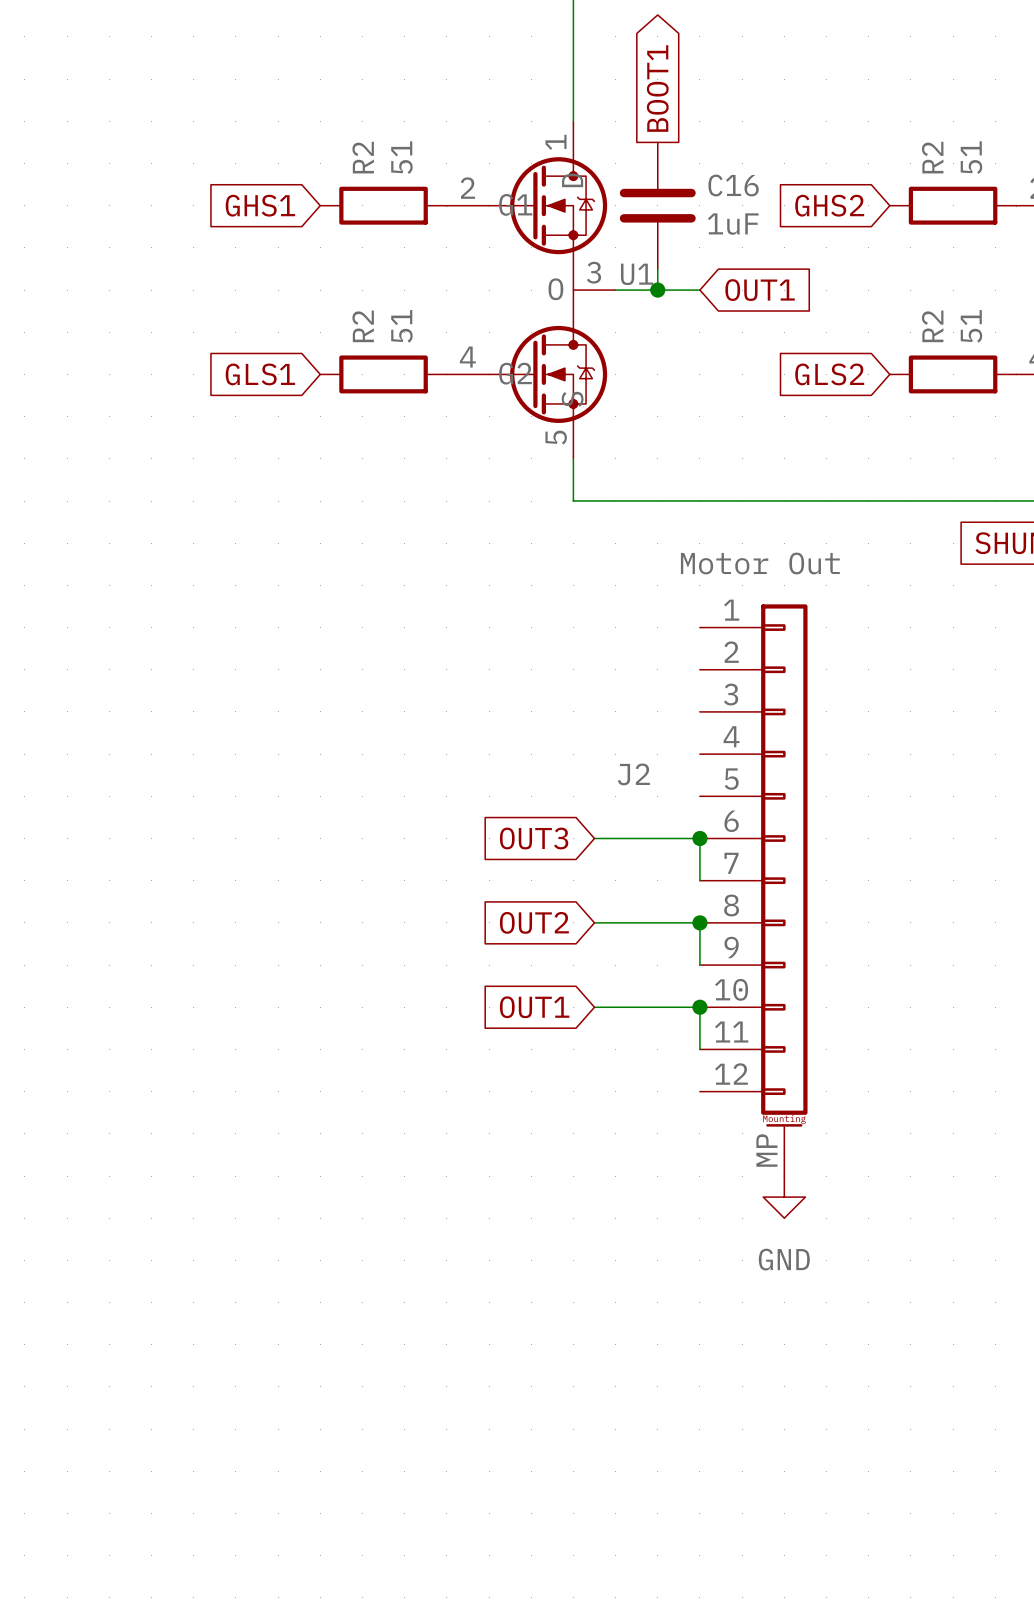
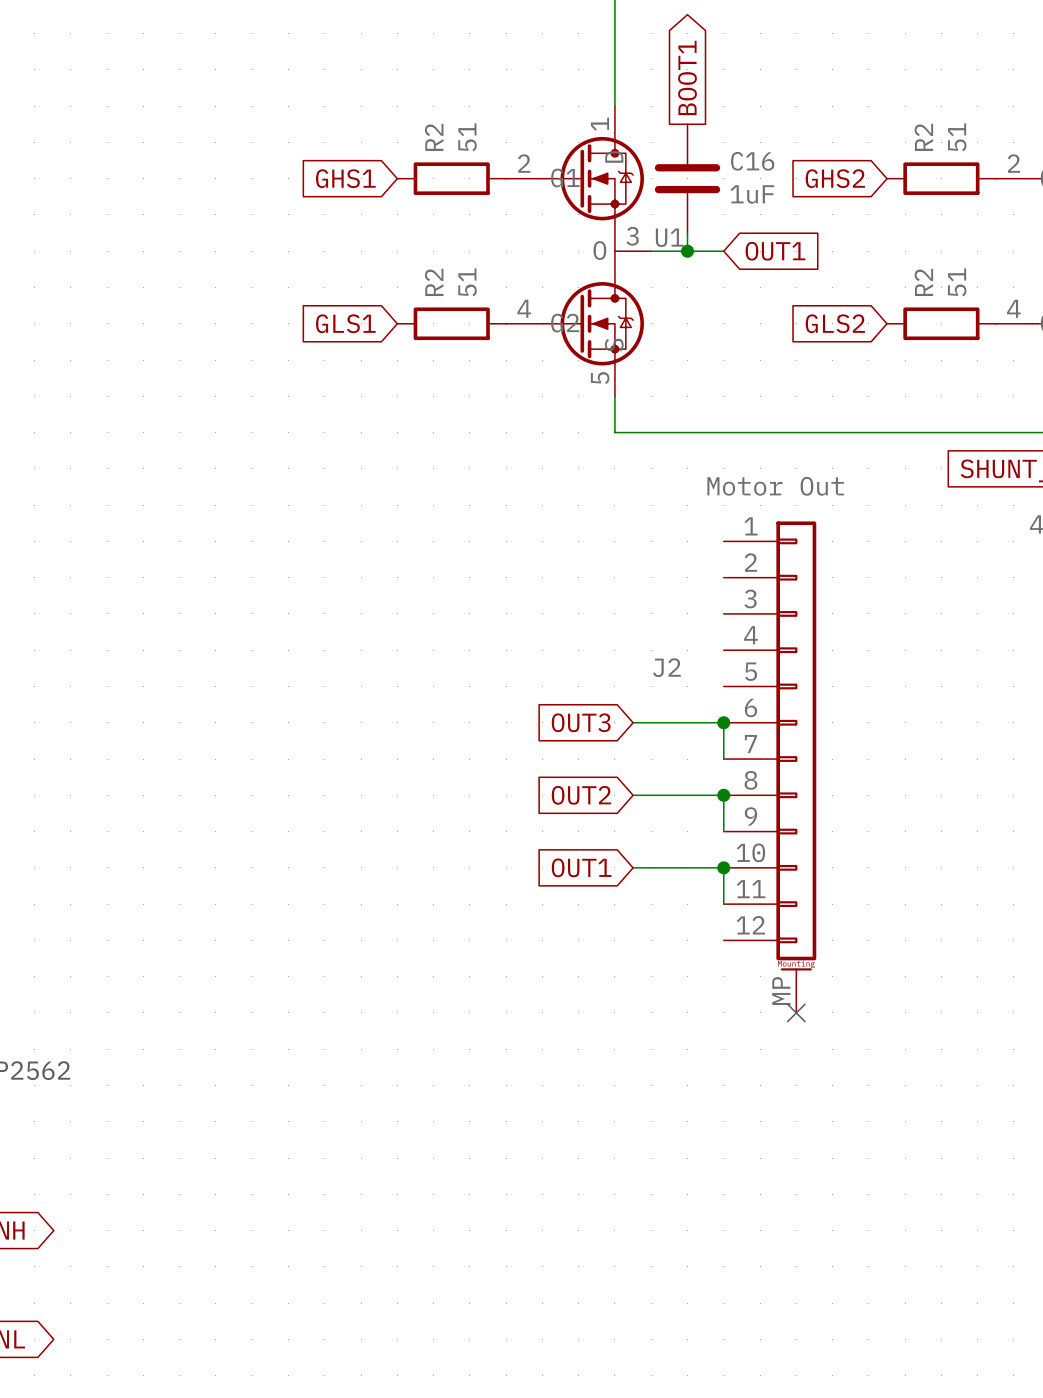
no-connect mark: none -> (796, 1012)
power symbol: GND (784, 1197) -> none

